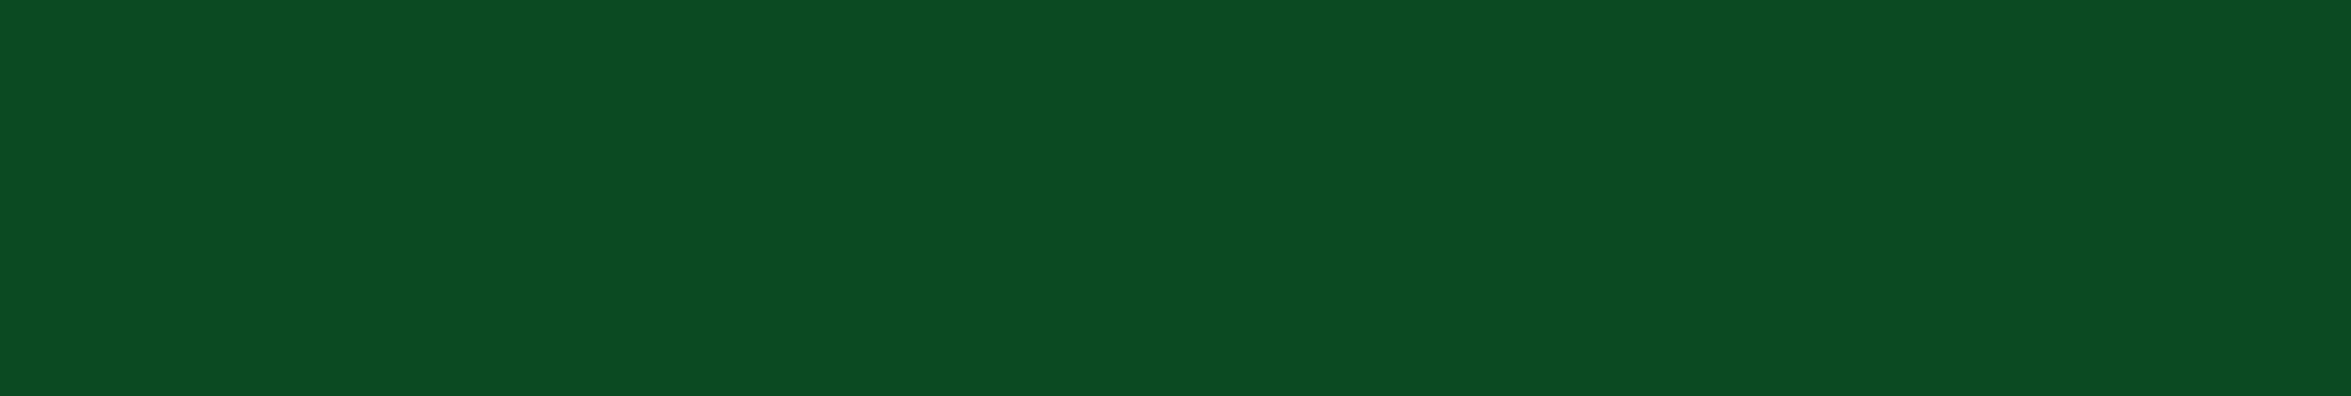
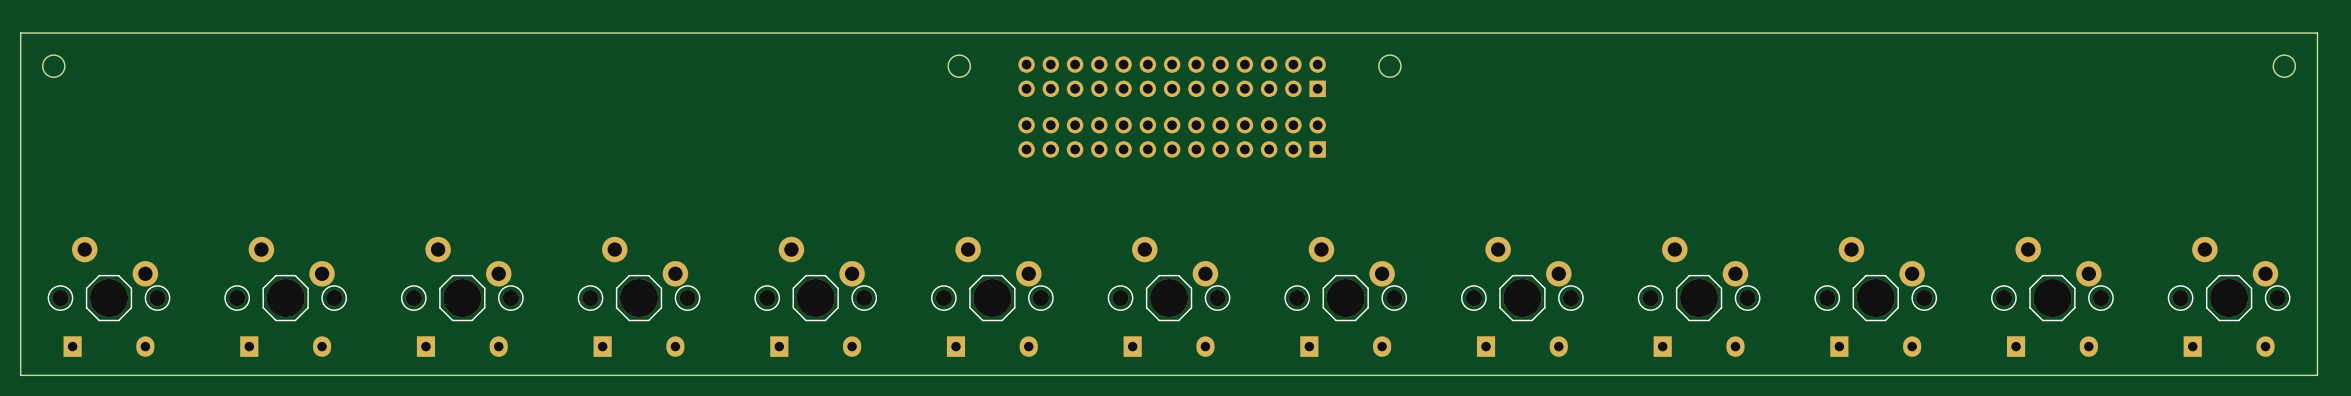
board edge: none -> (2317, 33) (20, 33) (20, 375) (2317, 375) (2317, 33)
round board edge: none -> [42, 54, 66, 78]
round board edge: none -> [947, 54, 972, 78]
round board edge: none -> [1378, 54, 1402, 78]
round board edge: none -> [2272, 54, 2297, 78]
part: none -> (1172, 76)
part: none -> (1172, 137)
part: none -> (108, 296)
part: none -> (285, 296)
part: none -> (462, 296)
part: none -> (639, 296)
part: none -> (815, 296)
part: none -> (992, 296)
part: none -> (1169, 296)
part: none -> (1345, 296)
part: none -> (1522, 296)
part: none -> (1699, 296)
part: none -> (1875, 296)
part: none -> (2052, 296)
part: none -> (2229, 296)

